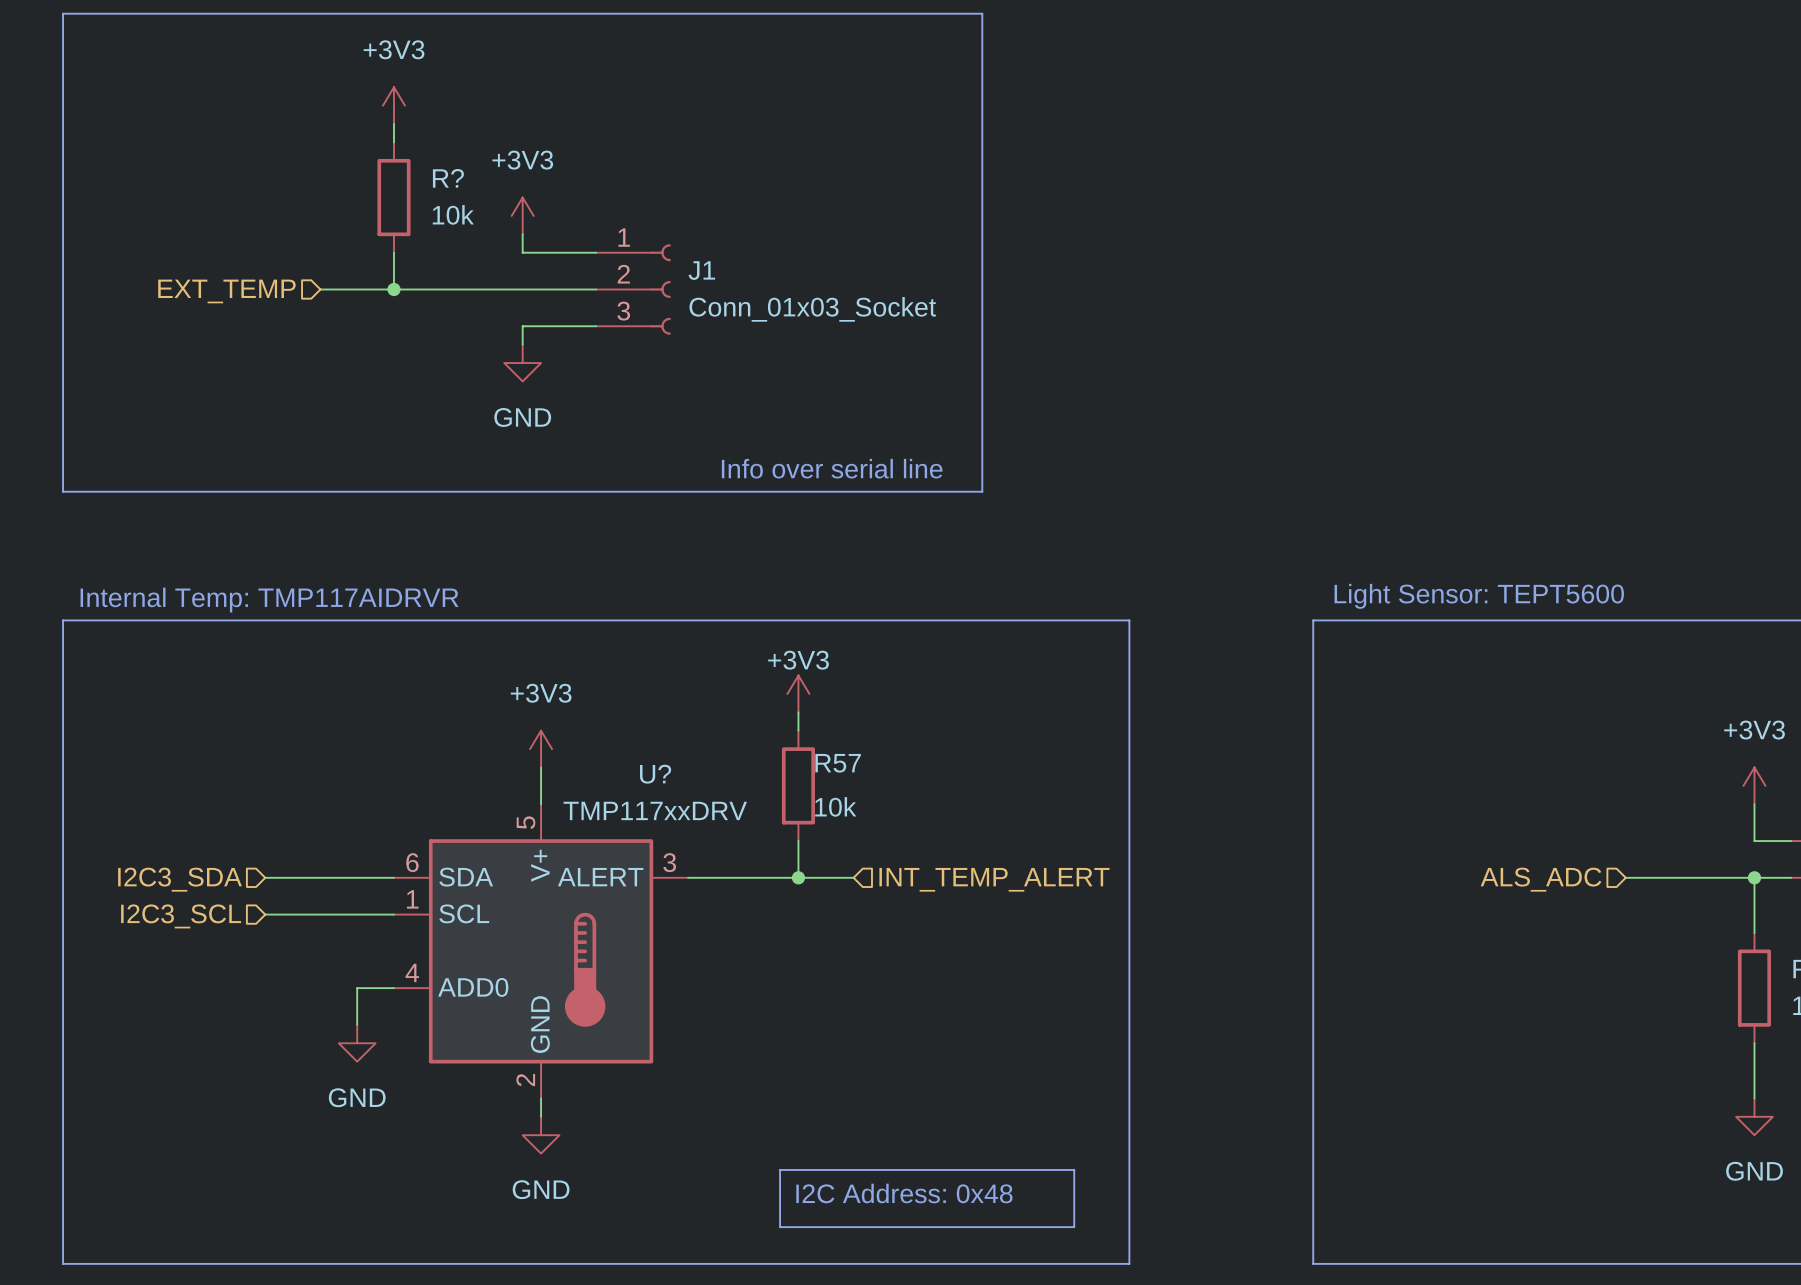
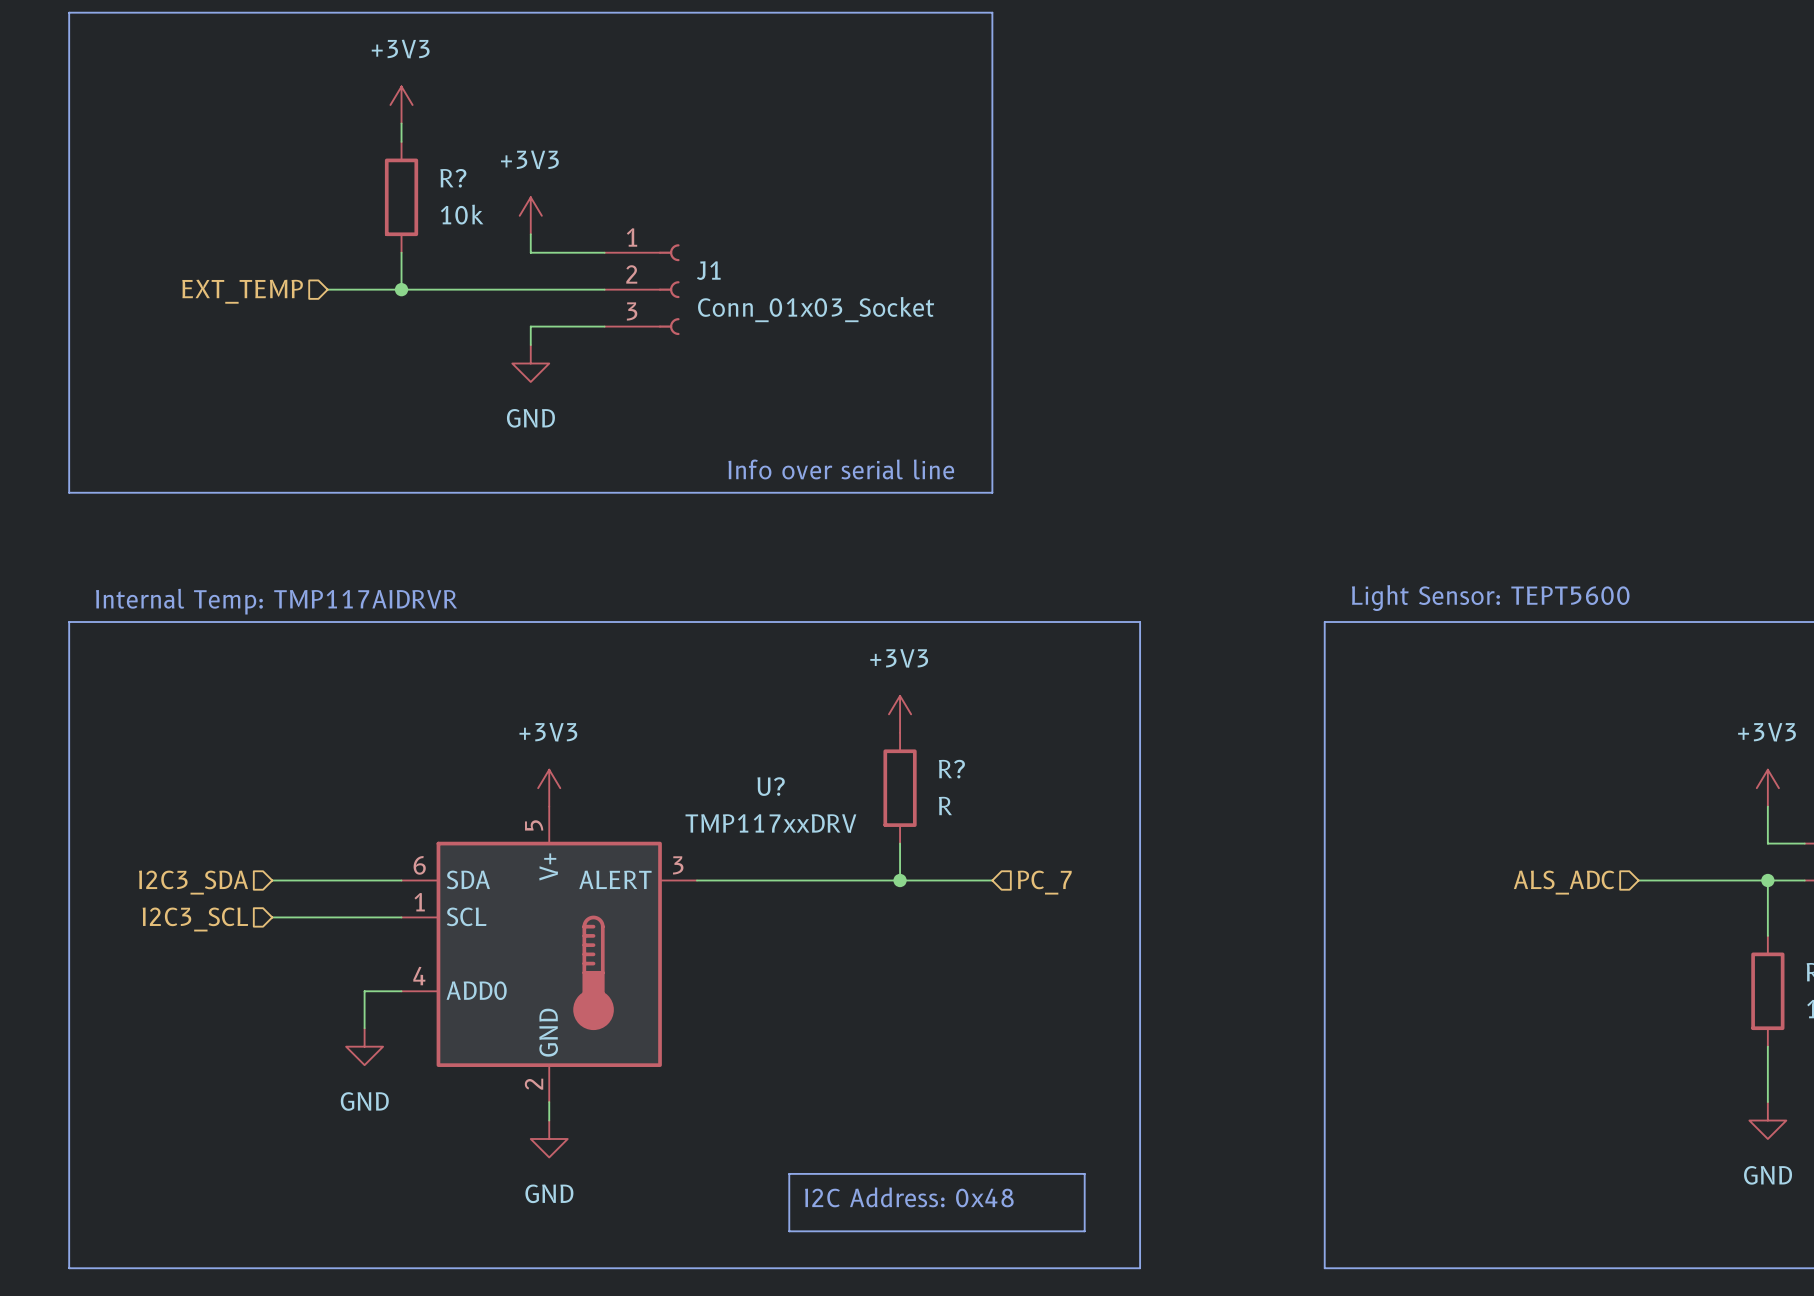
power symbol text position: +3V3 (798, 660) -> +3V3 (899, 658)
power symbol position: +3V3 (798, 693) -> +3V3 (900, 714)
wire: (798, 712) (798, 730) -> none
power symbol position: +3V3 (541, 749) -> +3V3 (549, 788)
U? name position: U? (655, 774) -> U? (771, 786)
R57: 10k (798, 785) -> none
R?: none -> R (900, 788)
U? value position: TMP117xxDRV (655, 810) -> TMP117xxDRV (770, 823)
wire: (798, 841) (798, 877) -> (900, 843) (900, 880)
junction: (798, 877) -> none
wire: none -> (863, 880) (992, 880)
junction: none -> (900, 880)
hierarchical label: INT_TEMP_ALERT (994, 879) -> none
hierarchical label: none -> PC_7 (1044, 882)

